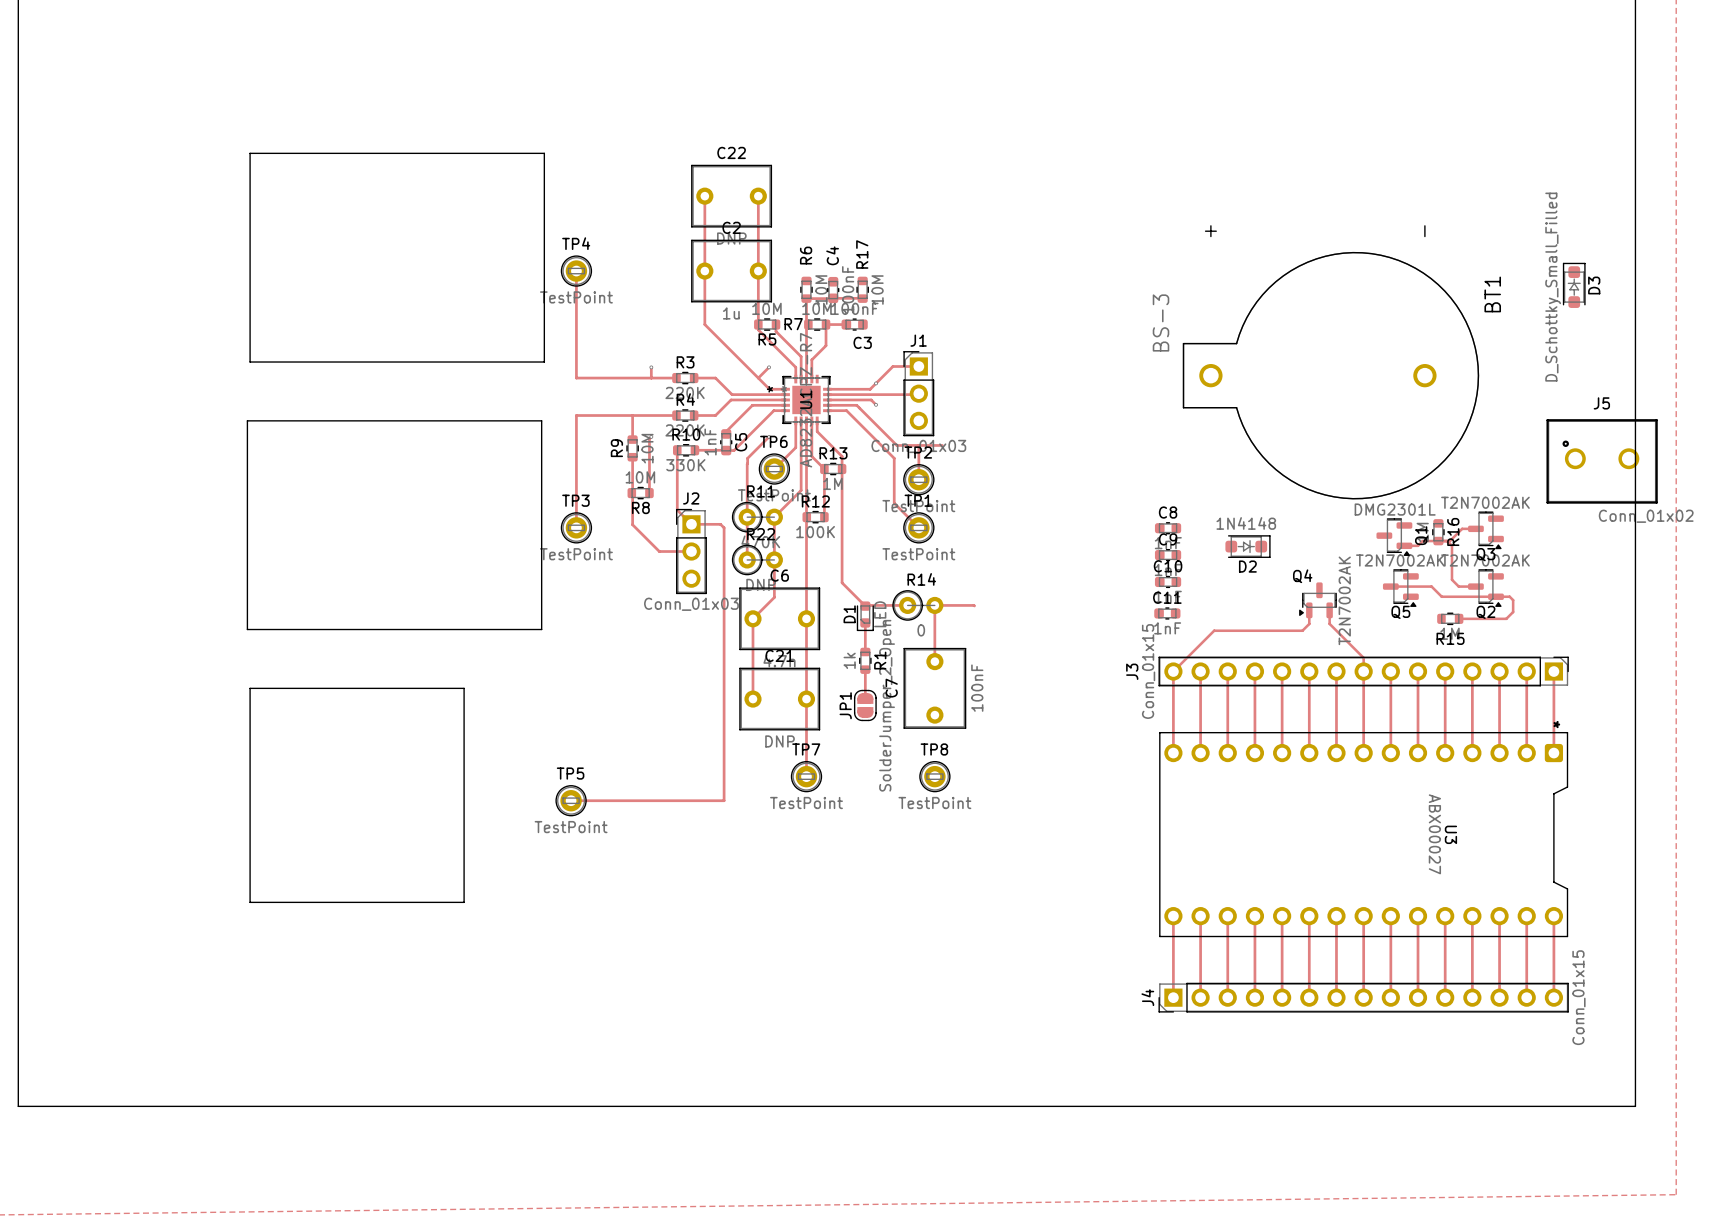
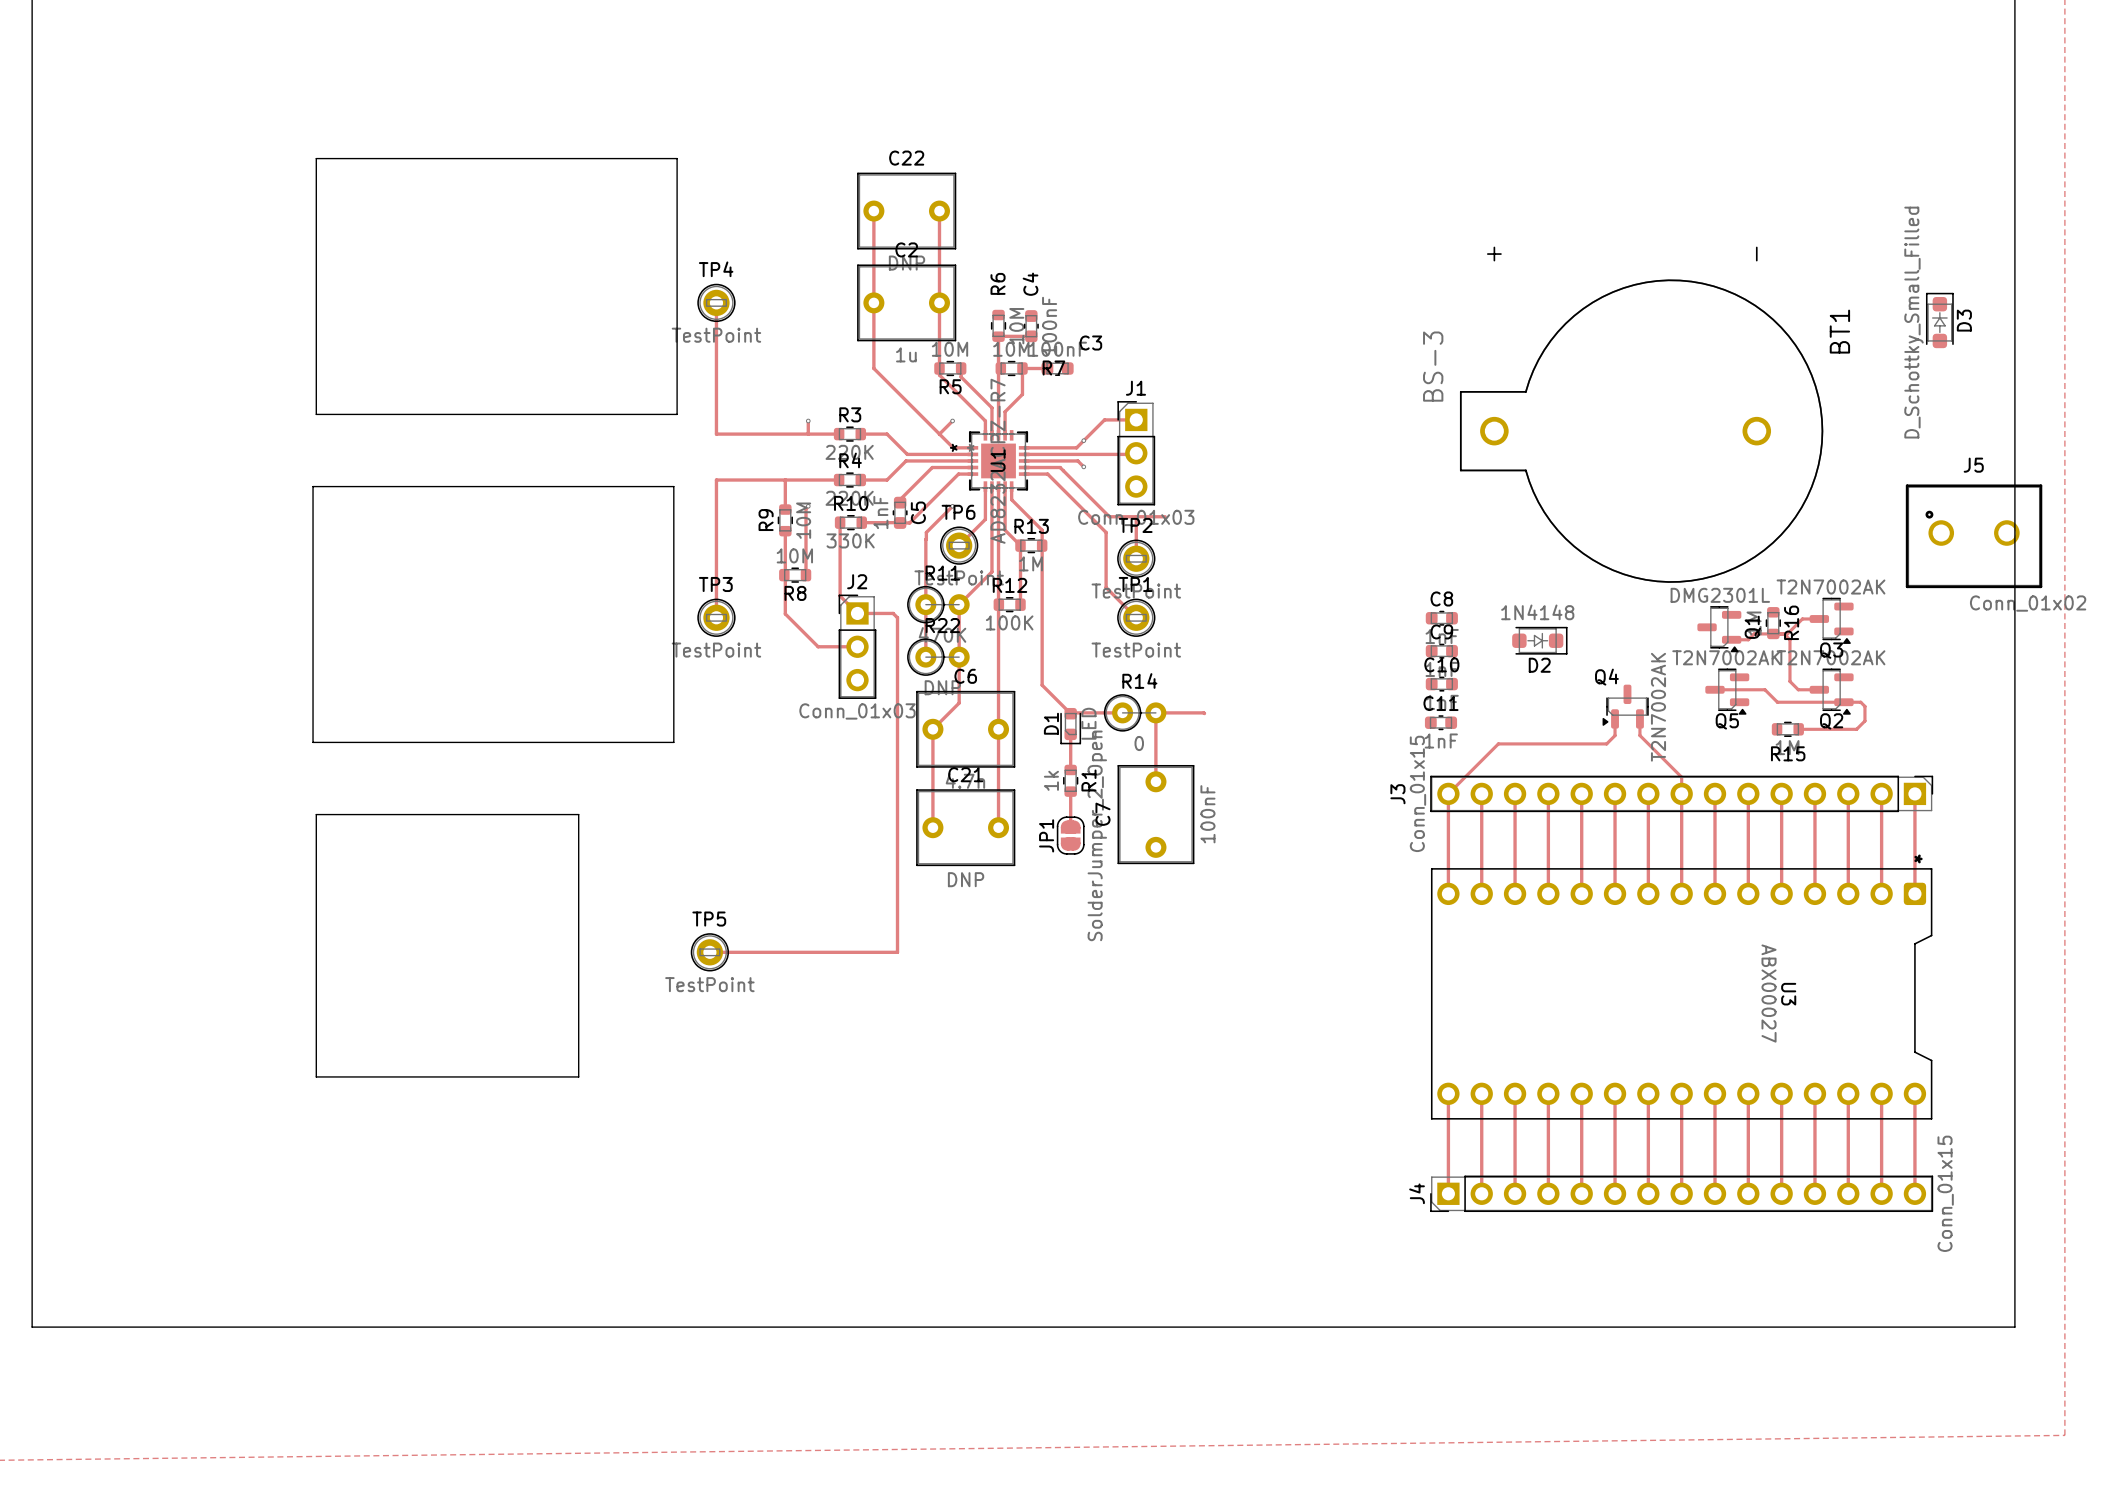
R17: 10M (862, 289) -> none
track: (806, 298) (862, 298) -> (998, 336) (1028, 336)
R7 name position: R7 (793, 324) -> R7 (1053, 368)
C3 name position: C3 (862, 342) -> C3 (1090, 343)
track: (806, 699) (806, 776) -> none
TP7: TestPoint (806, 776) -> none
TP8: TestPoint (934, 776) -> none

